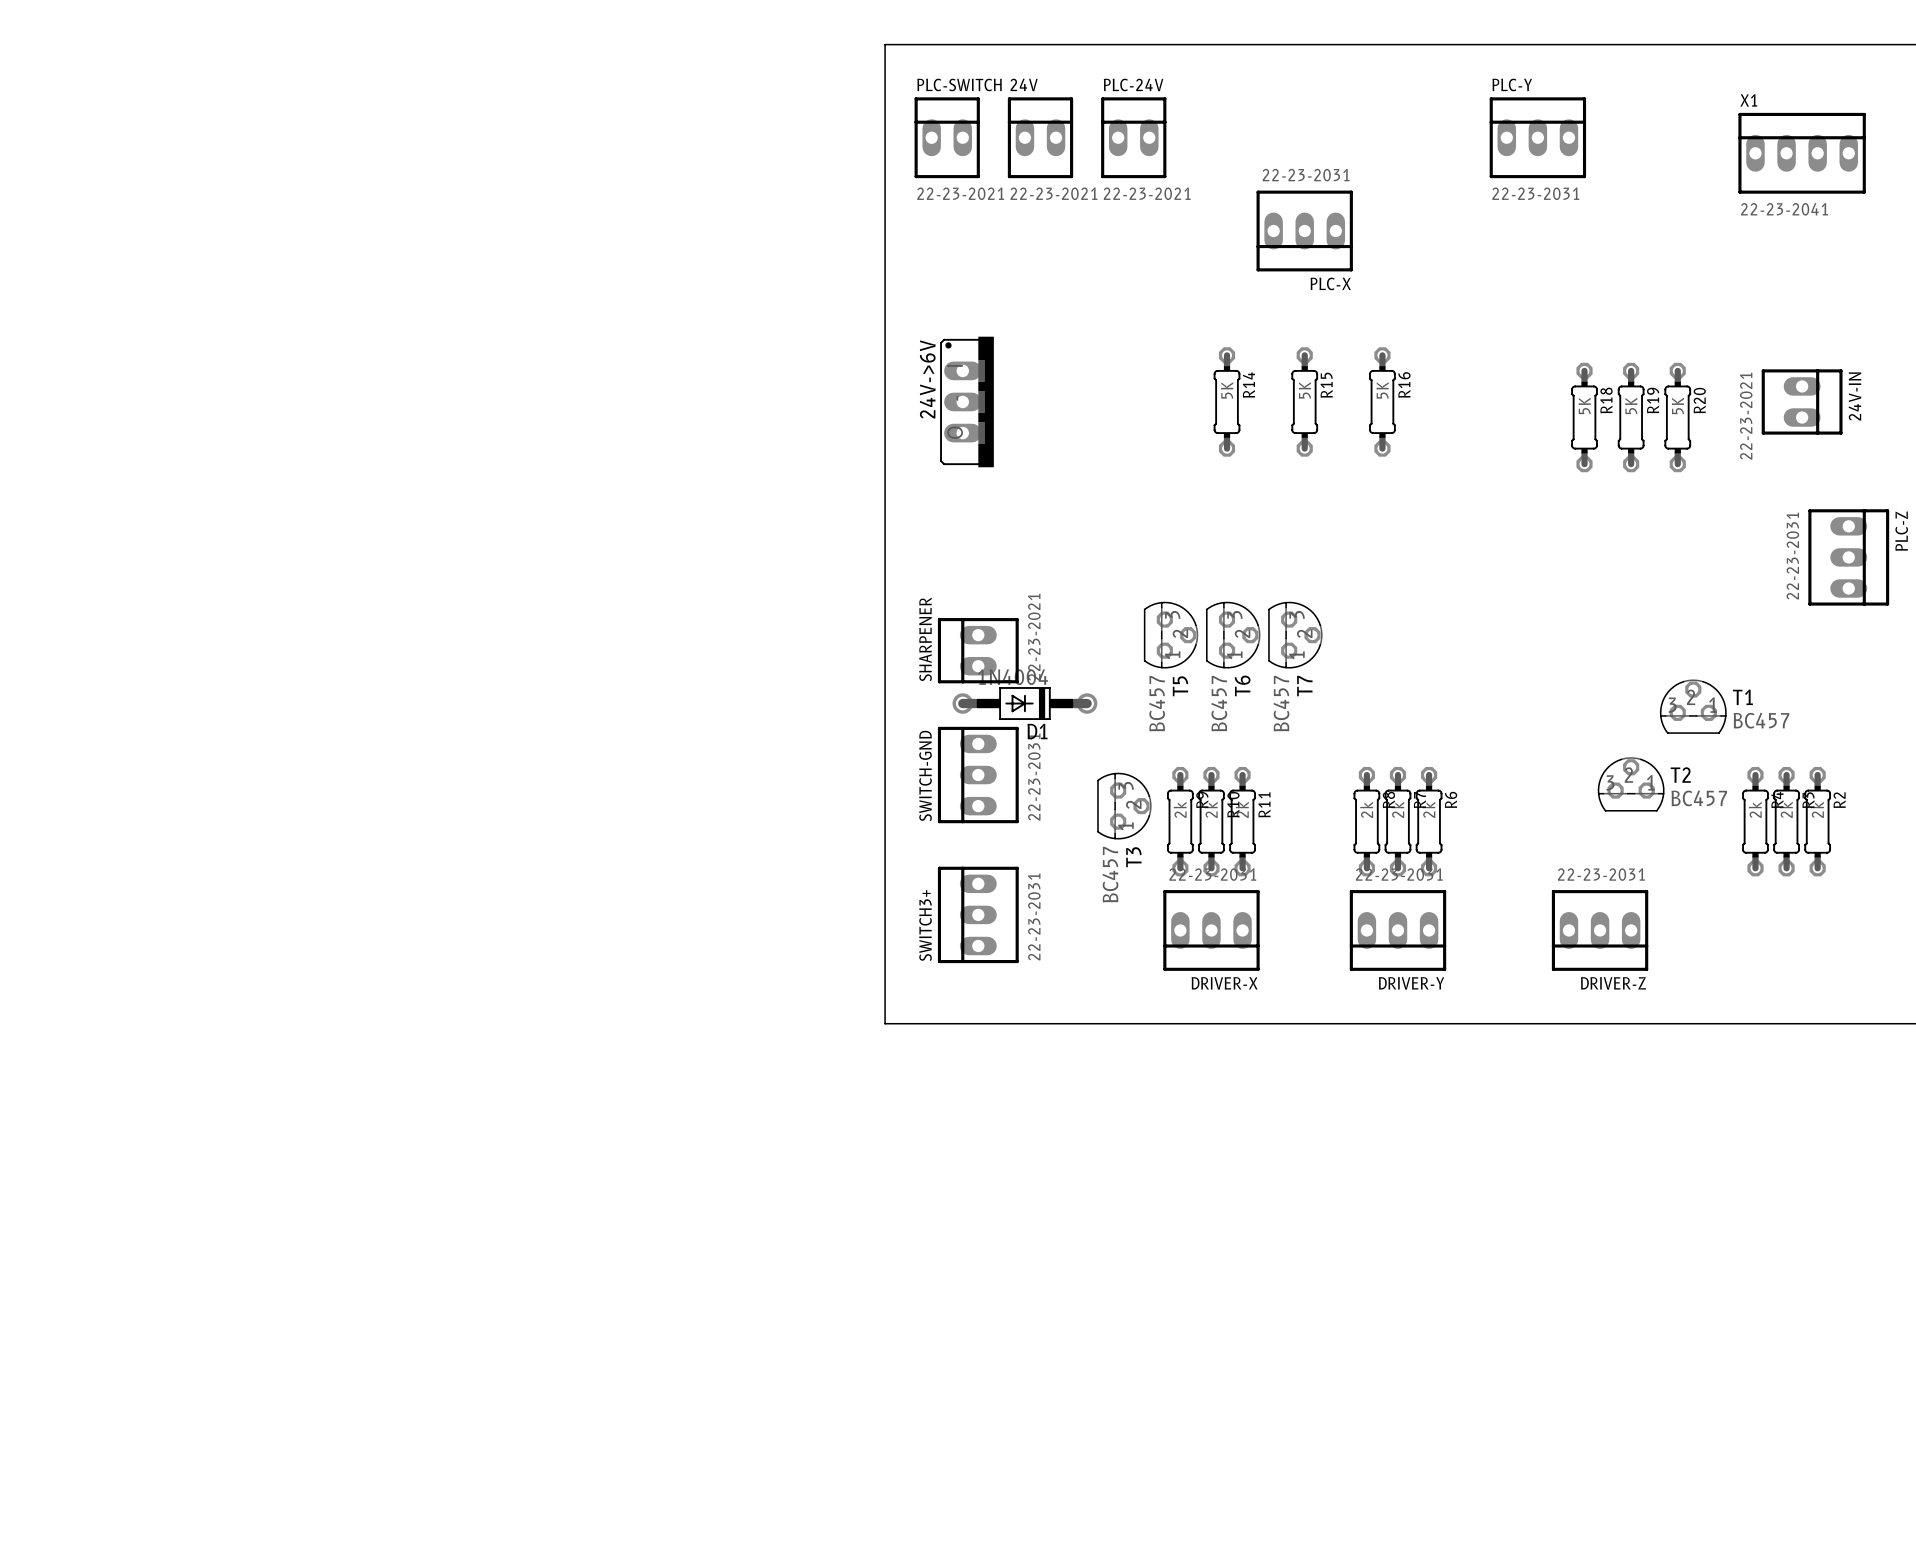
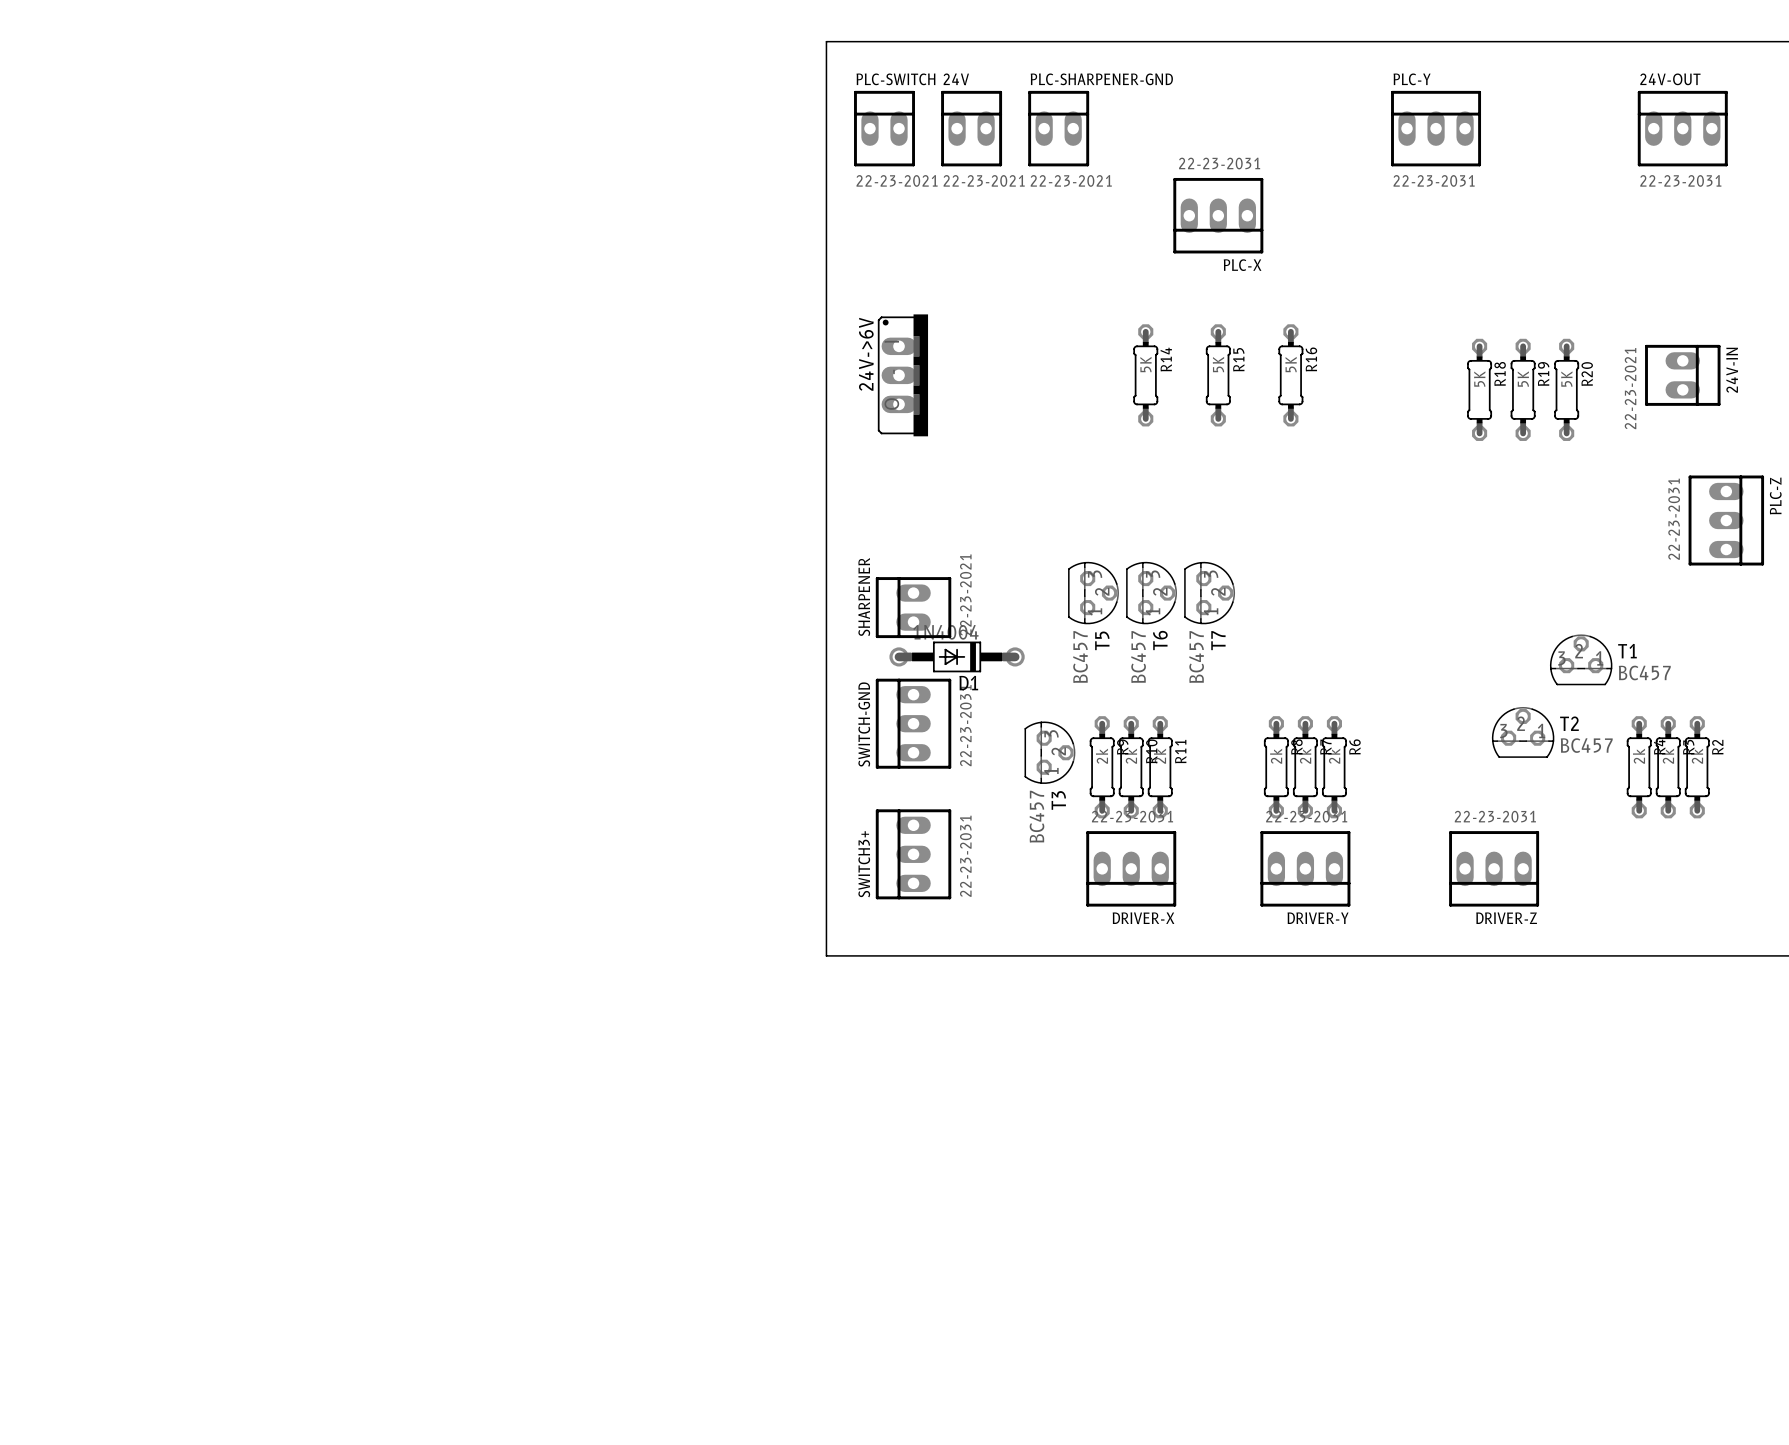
PLC-24V name: PLC-24V (1133, 84) -> PLC-SHARPENER-GND (1101, 79)
24V-OUT: none -> 22-23-2031 (1682, 128)
X1: 22-23-2041 (1802, 153) -> none

